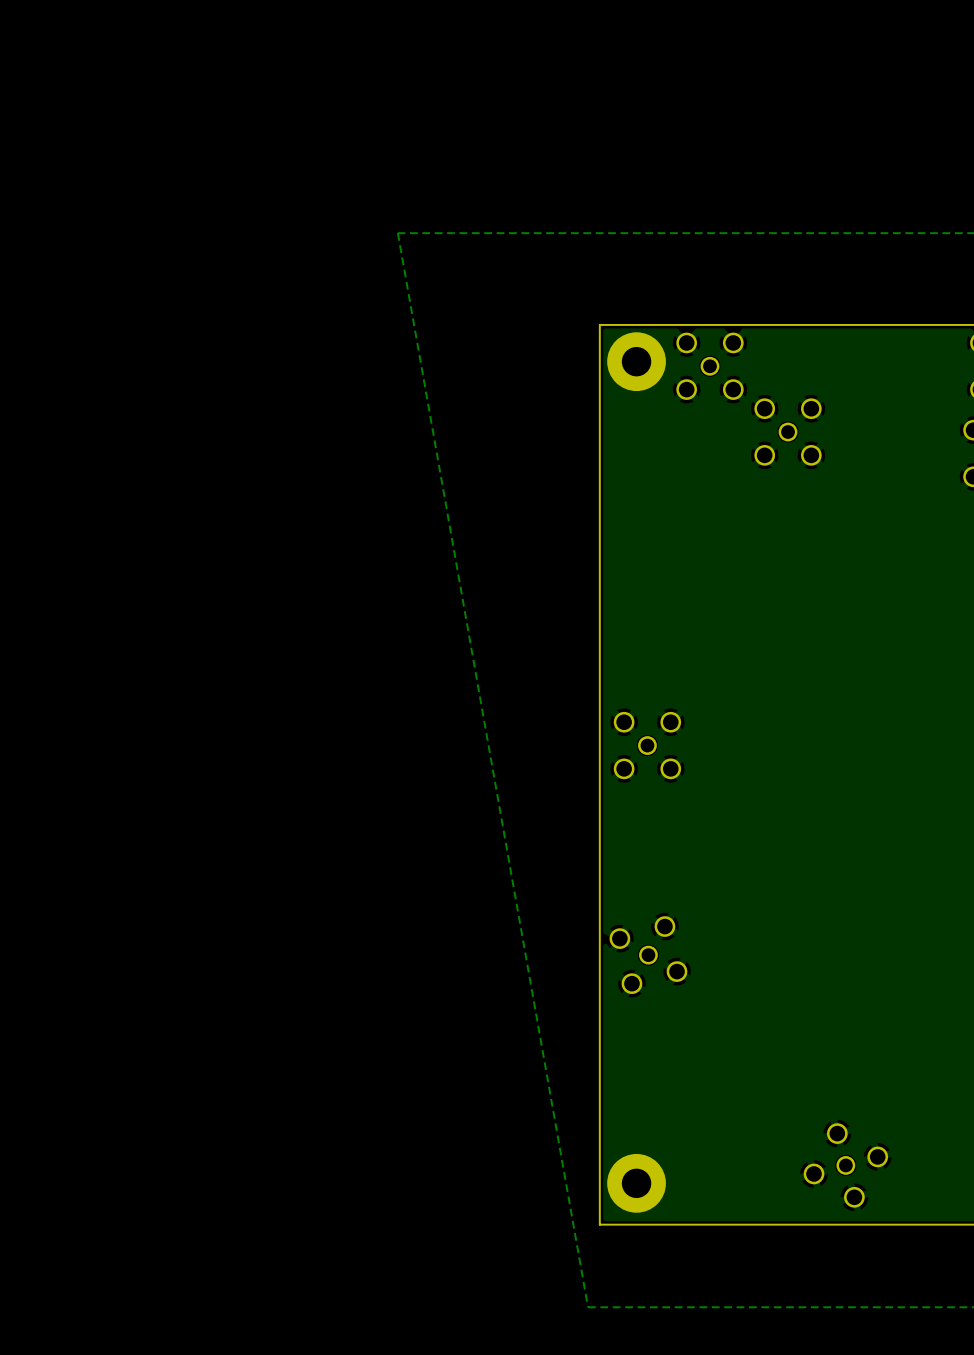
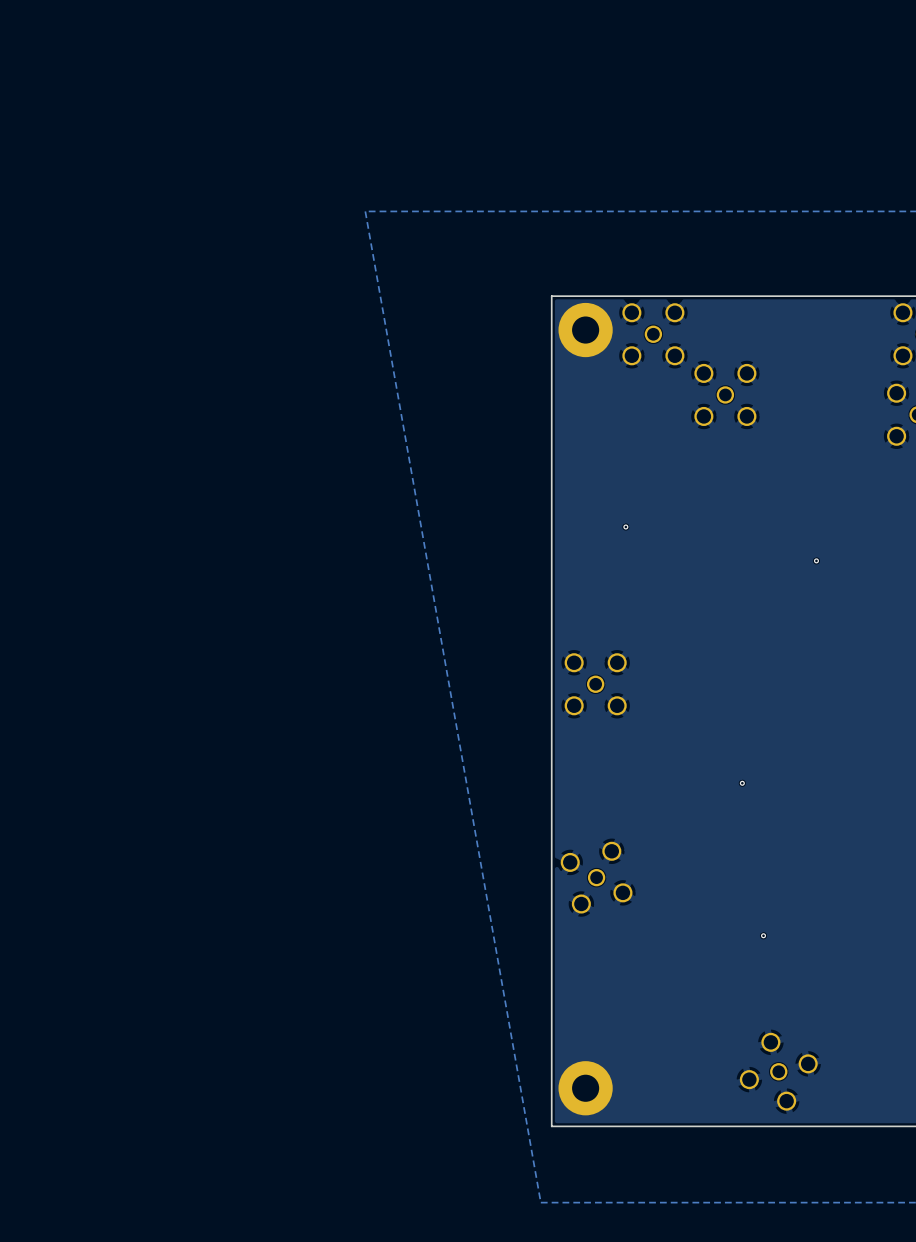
via: none -> (625, 527)
via: none -> (816, 560)
via: none -> (742, 783)
via: none -> (763, 935)

